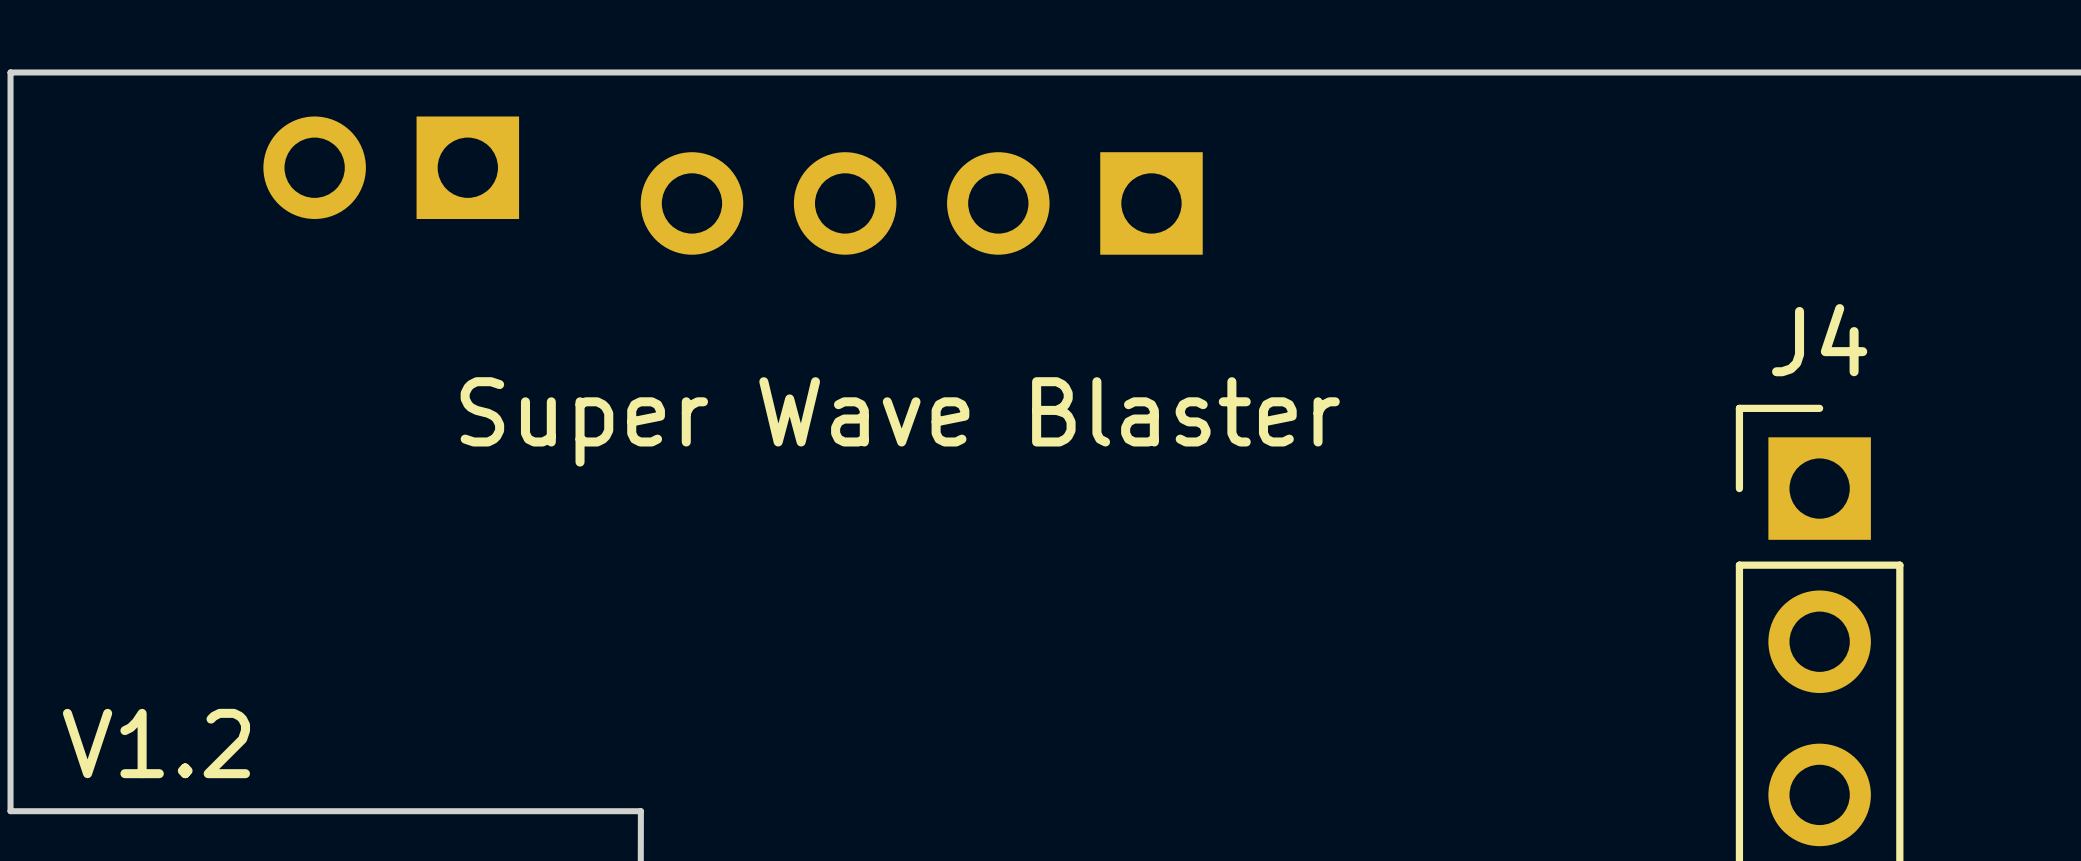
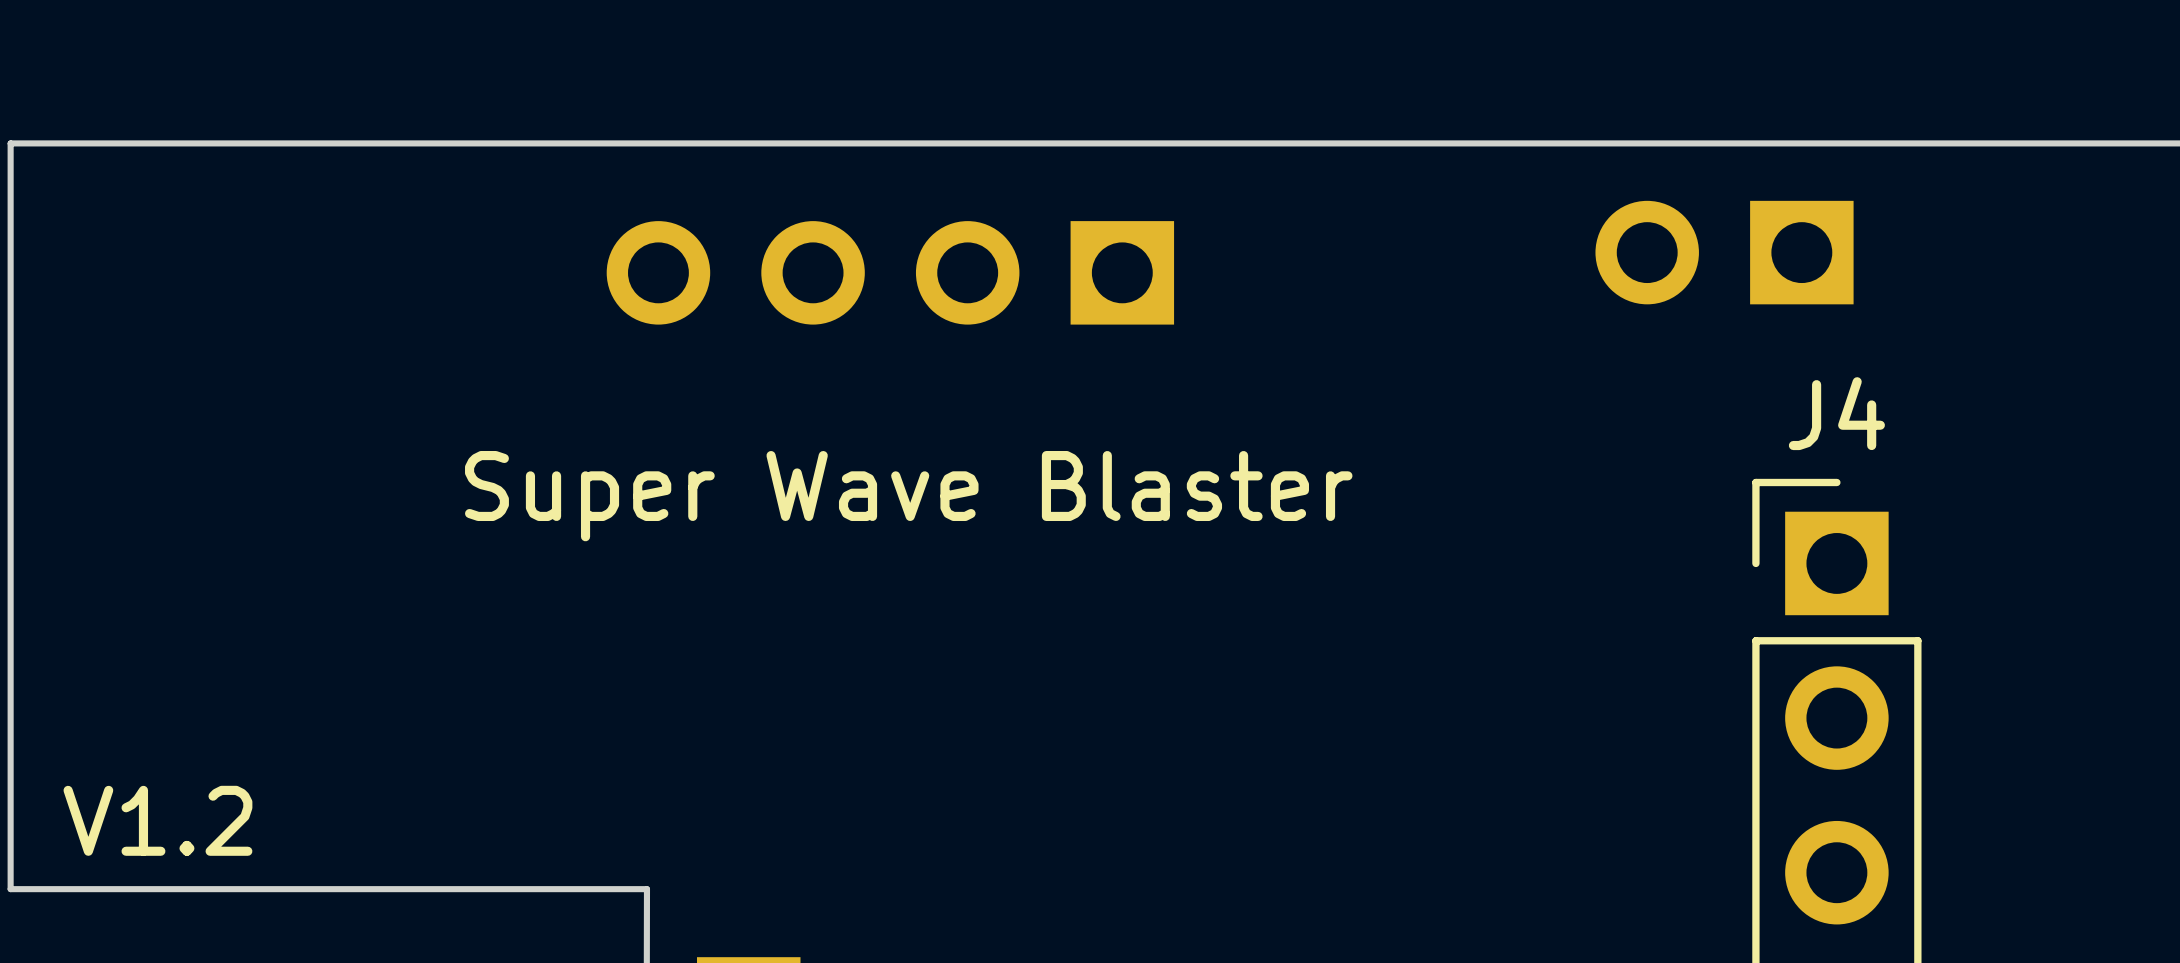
part position: (391, 167) -> (1724, 252)
part position: (921, 203) -> (890, 272)

